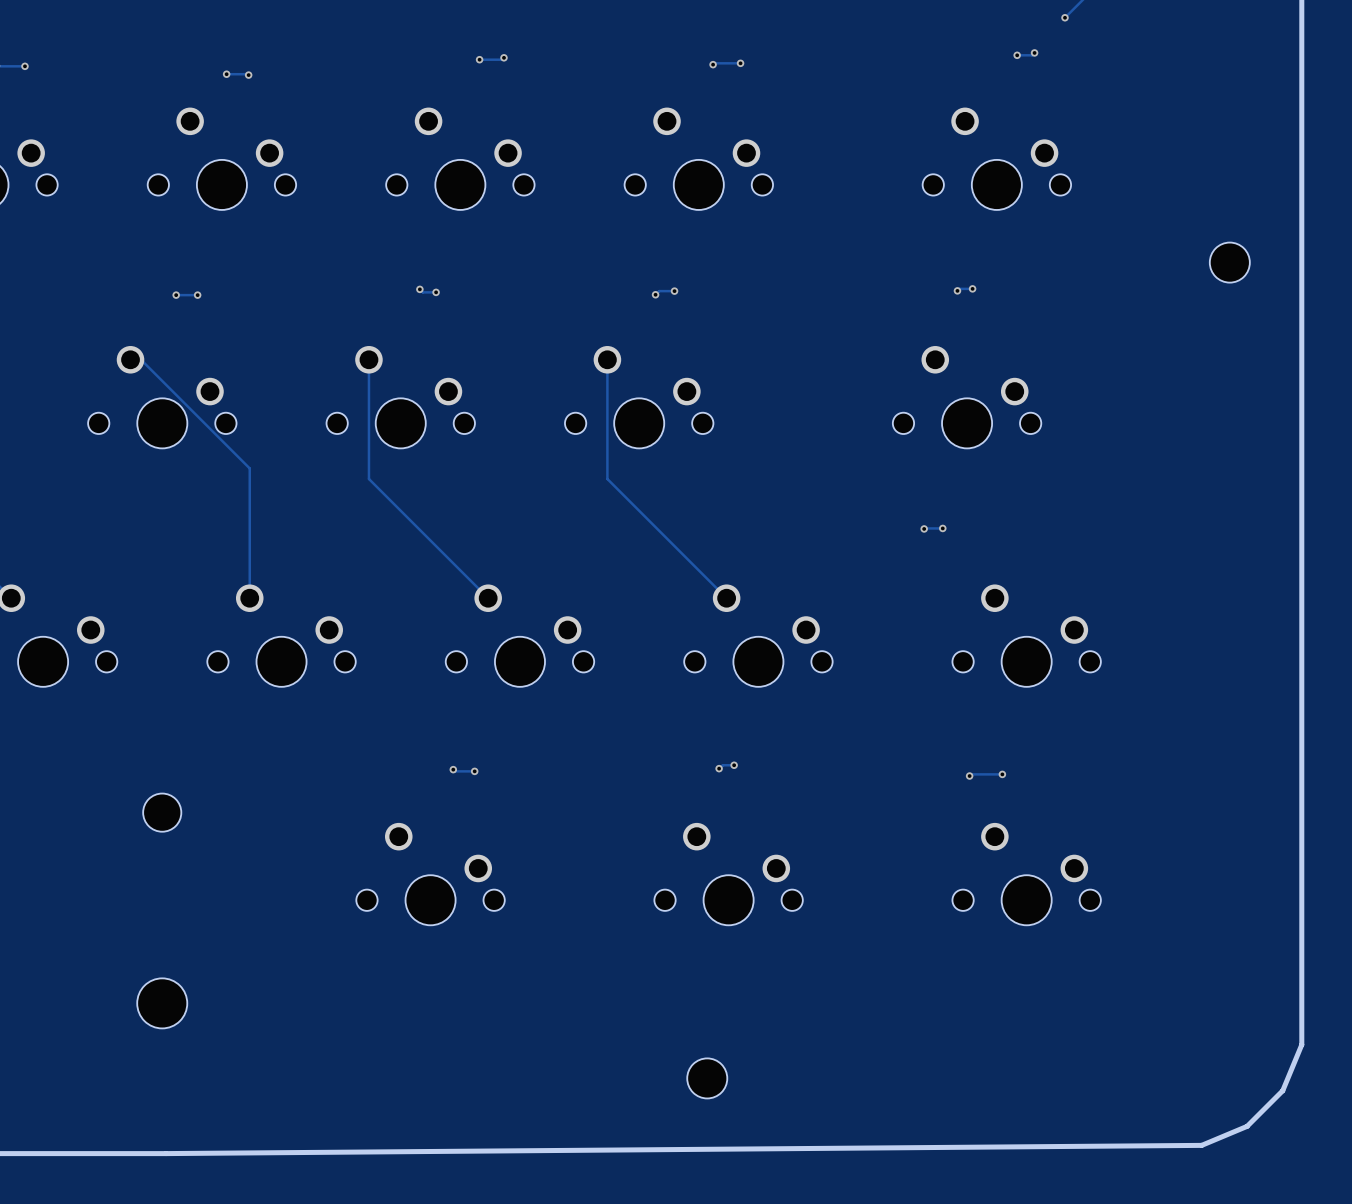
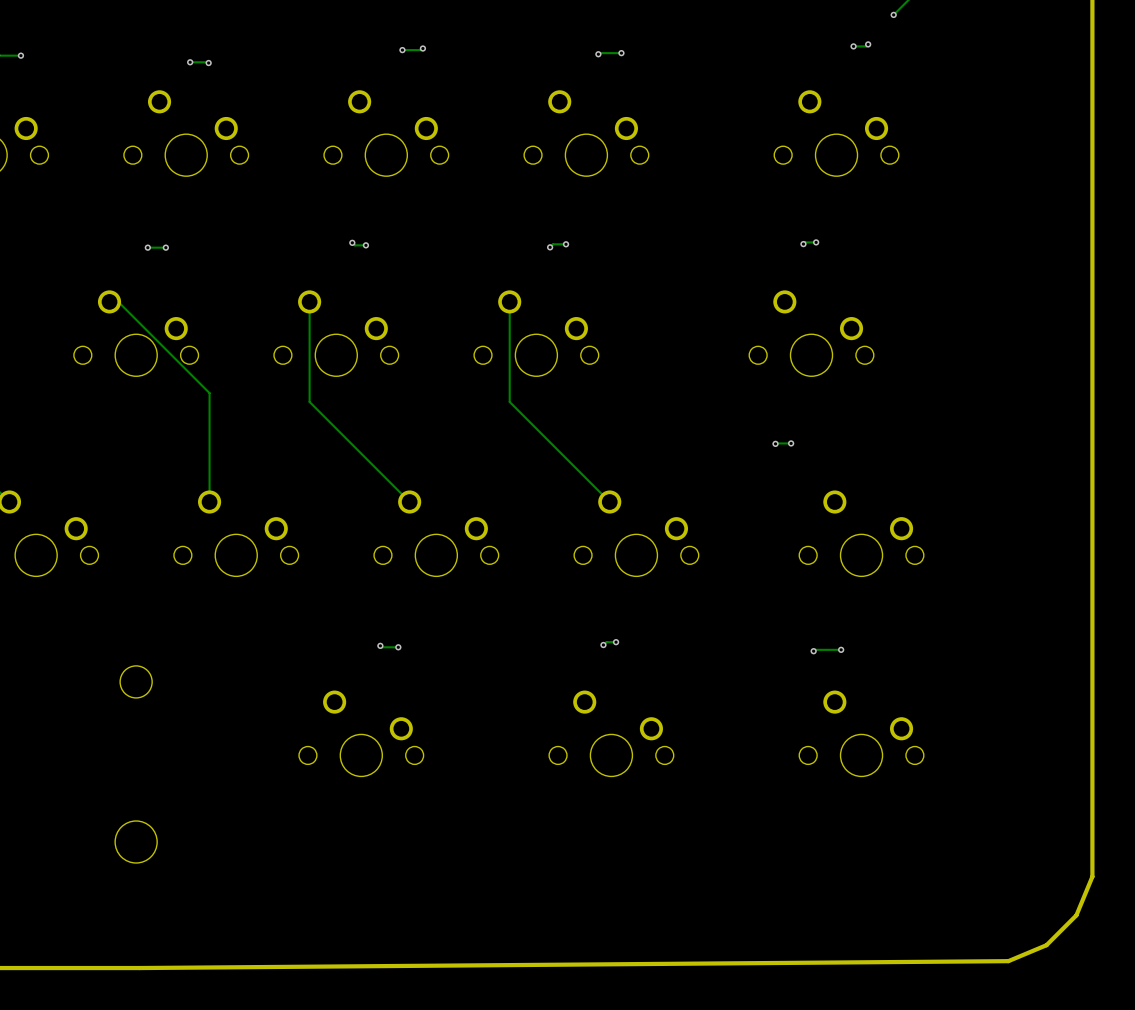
part: (1229, 262) -> none
part: (707, 1078) -> none

